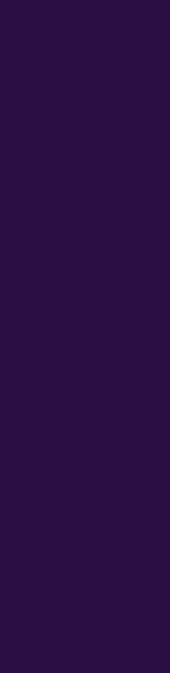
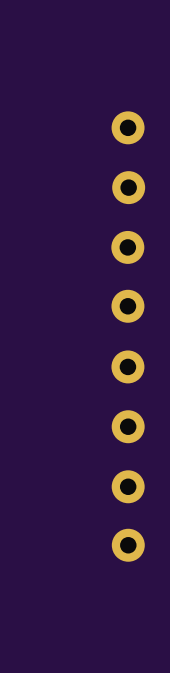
part: none -> (128, 127)
part: none -> (128, 187)
part: none -> (127, 247)
part: none -> (127, 306)
part: none -> (127, 366)
part: none -> (128, 426)
part: none -> (128, 486)
part: none -> (128, 545)

